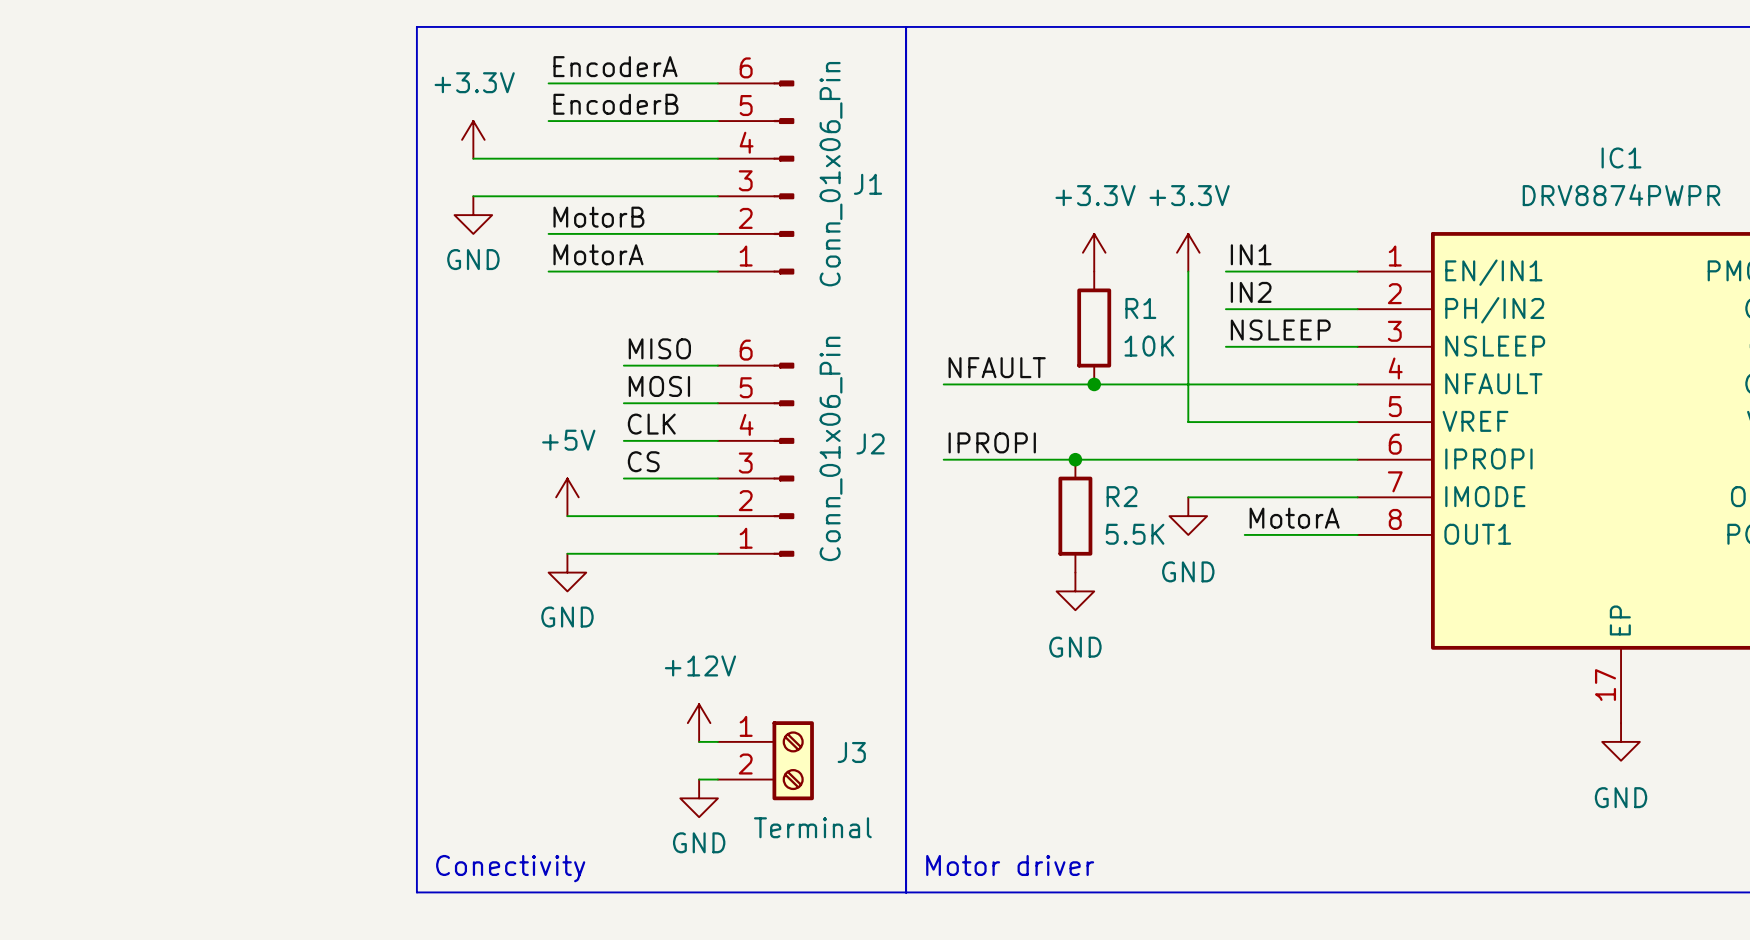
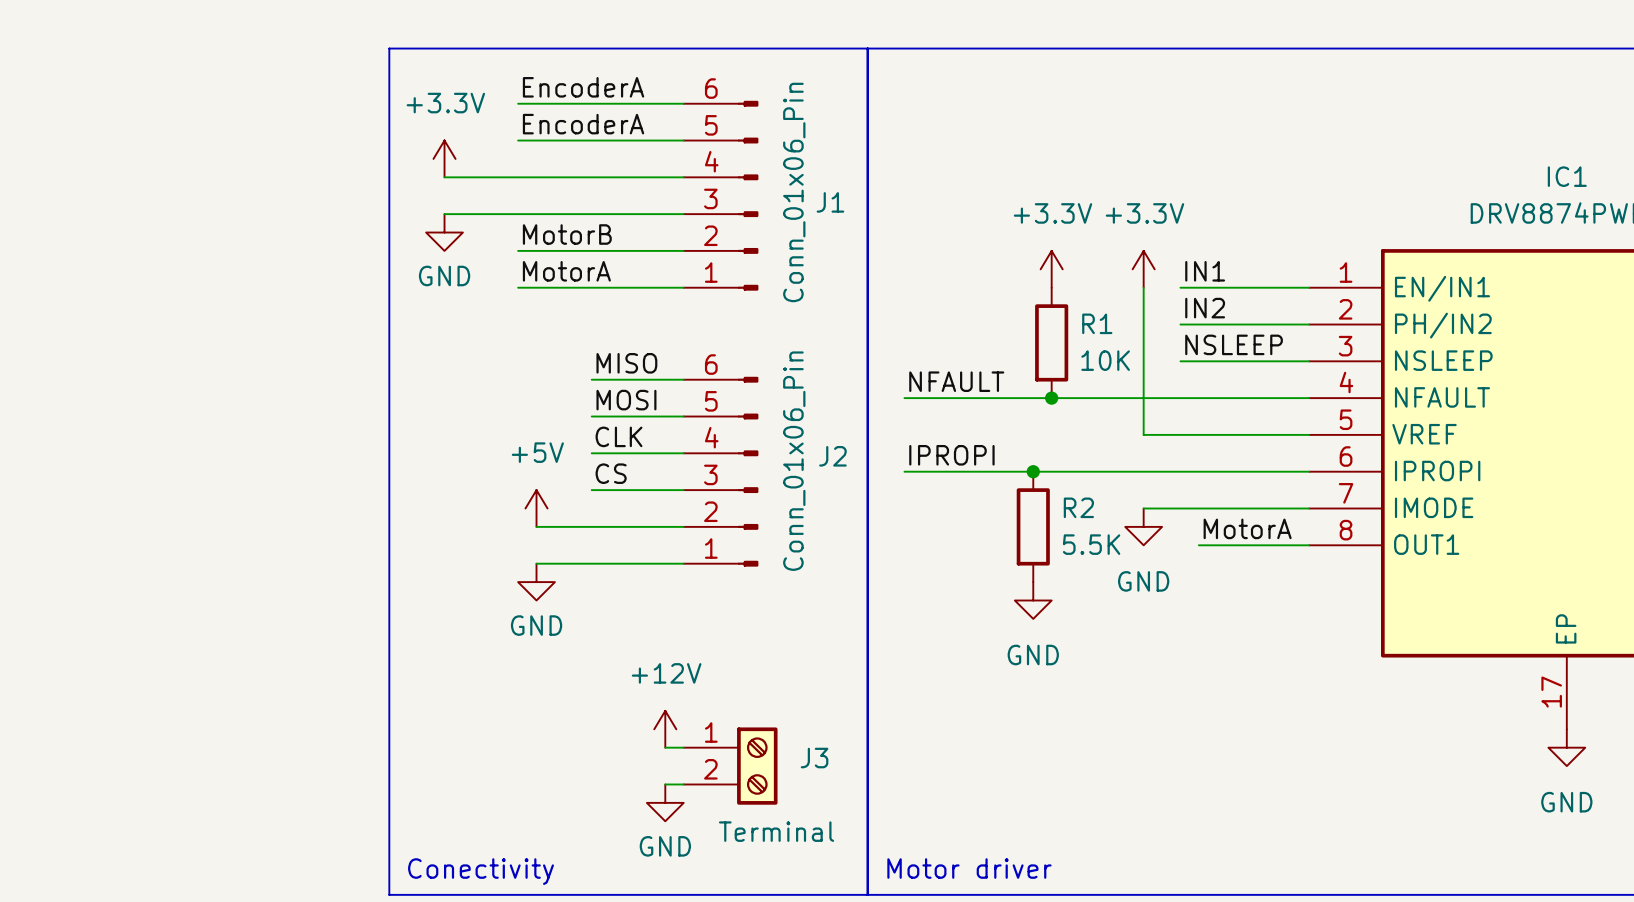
label: EncoderB (615, 104) -> EncoderA (583, 124)

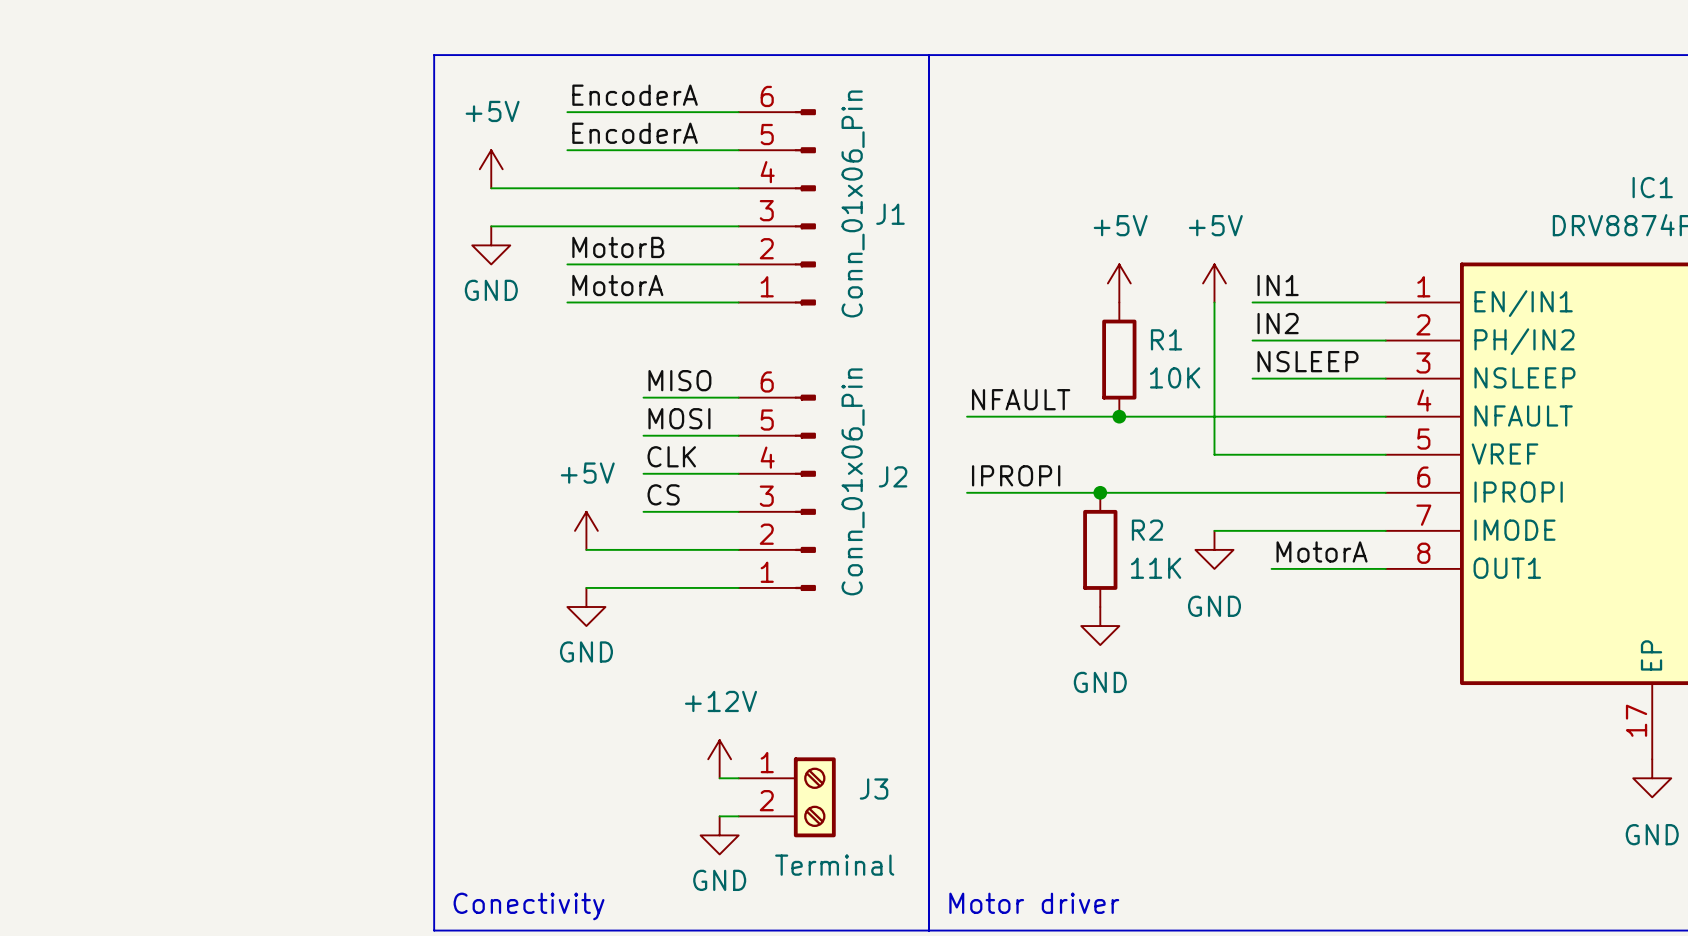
power symbol: +3.3V (444, 158) -> +5V (491, 169)
power symbol: +3.3V (1051, 269) -> +5V (1119, 283)
power symbol: +3.3V (1143, 269) -> +5V (1214, 283)
R2 value: 5.5K (1091, 544) -> 11K (1156, 568)

